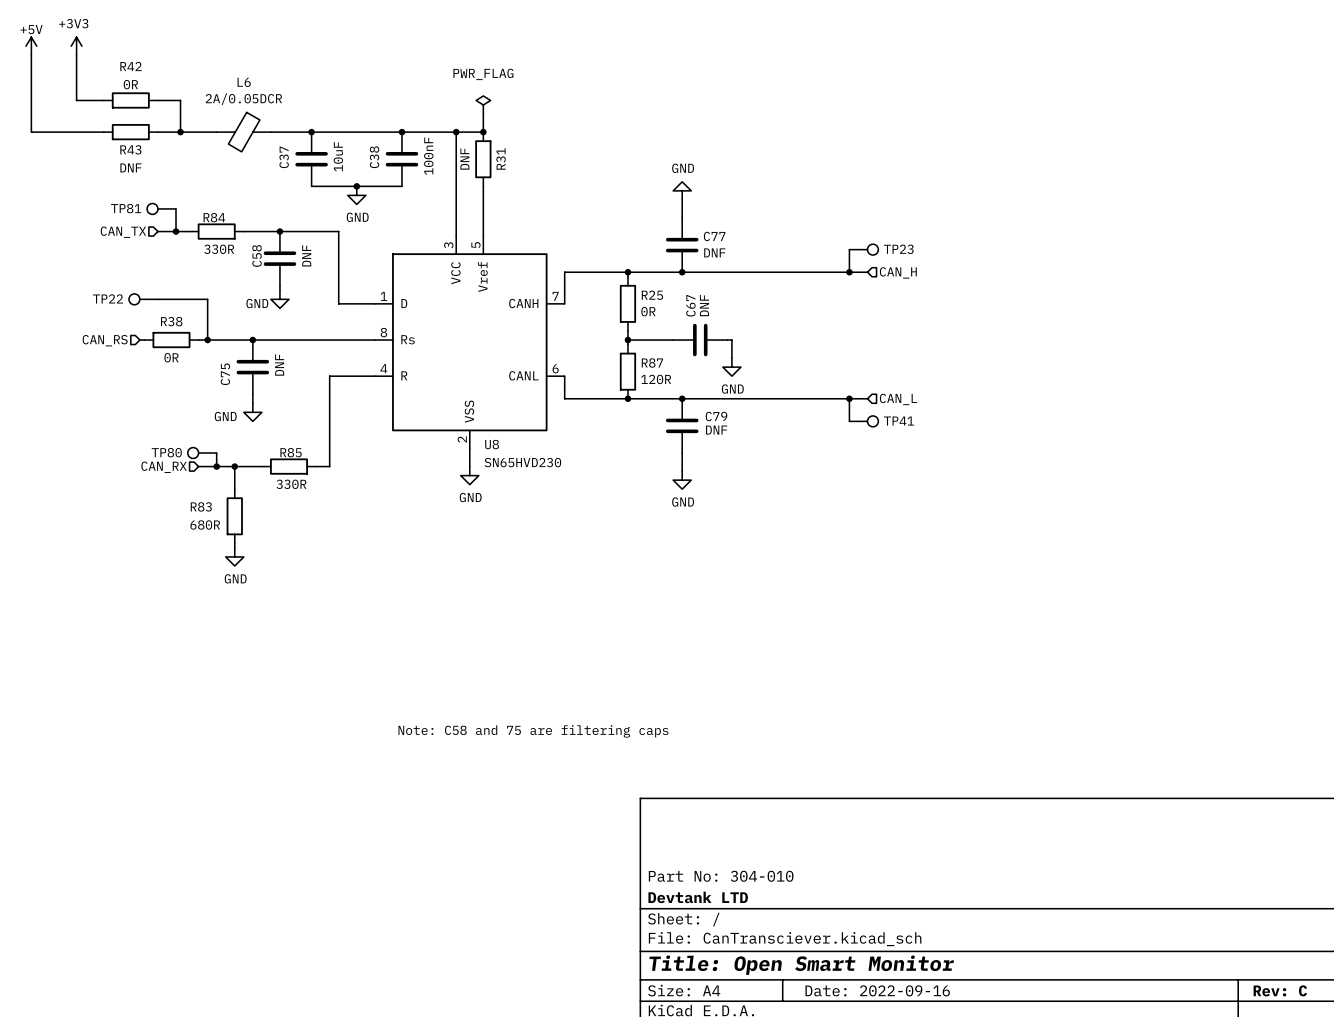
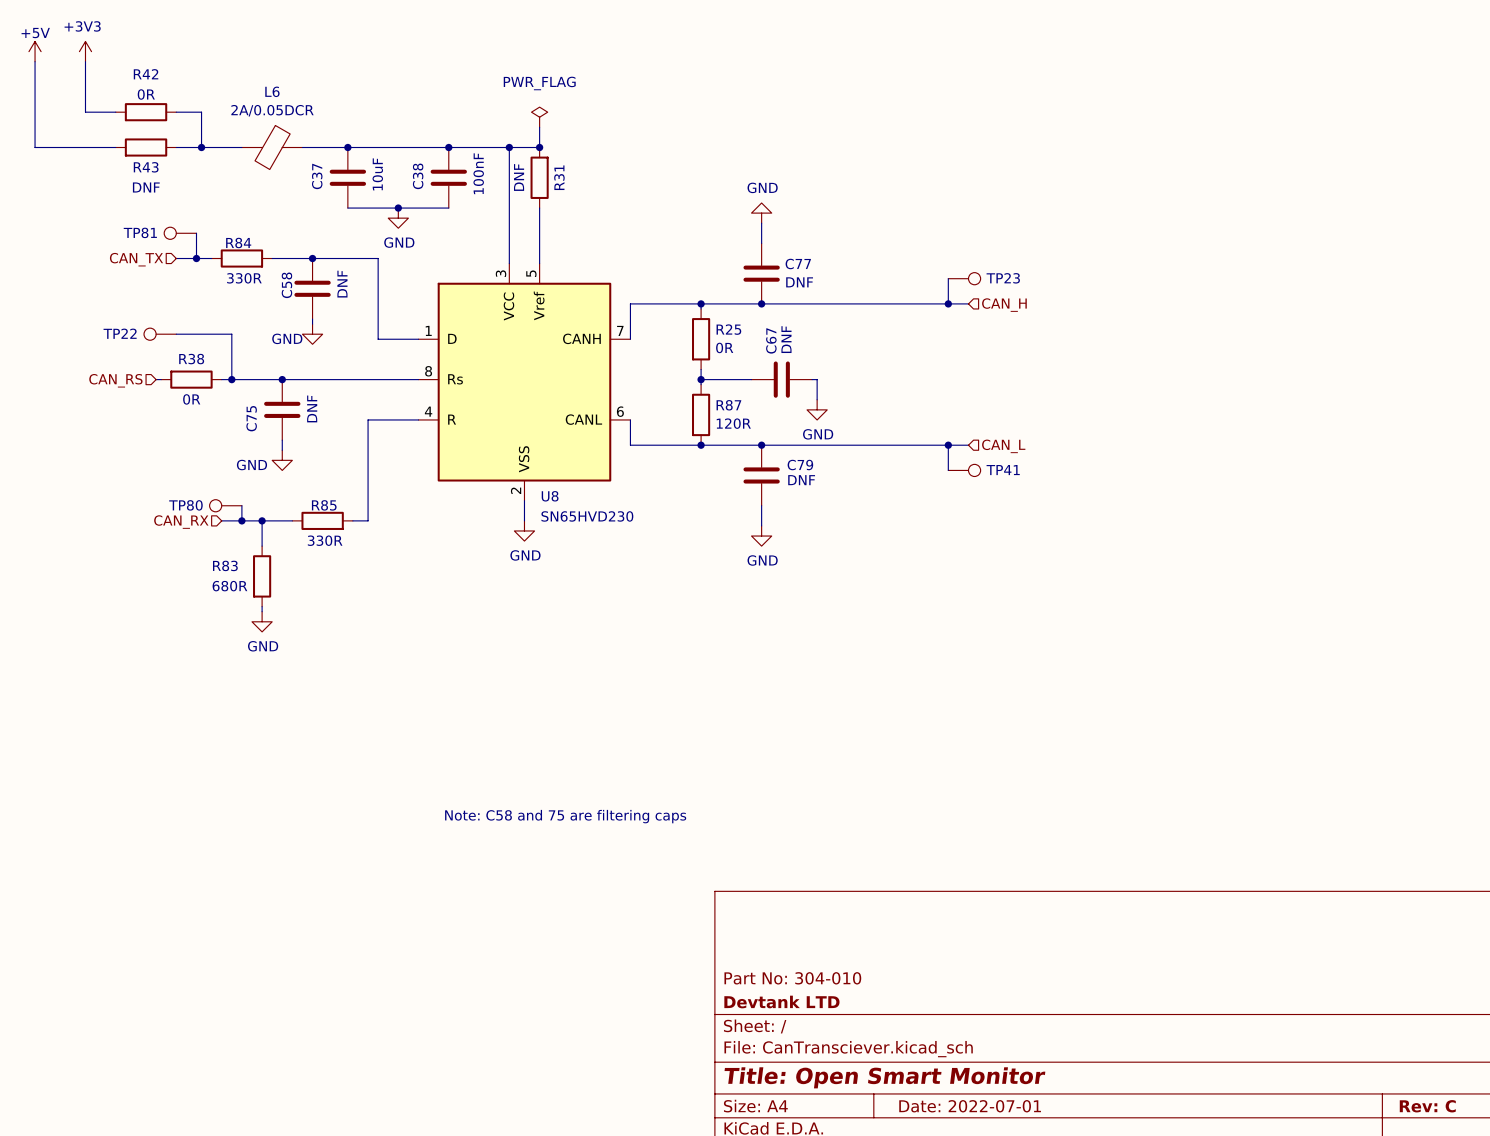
title block: Date: 2022-09-16 (877, 990) -> Date: 2022-07-01 (970, 1106)

